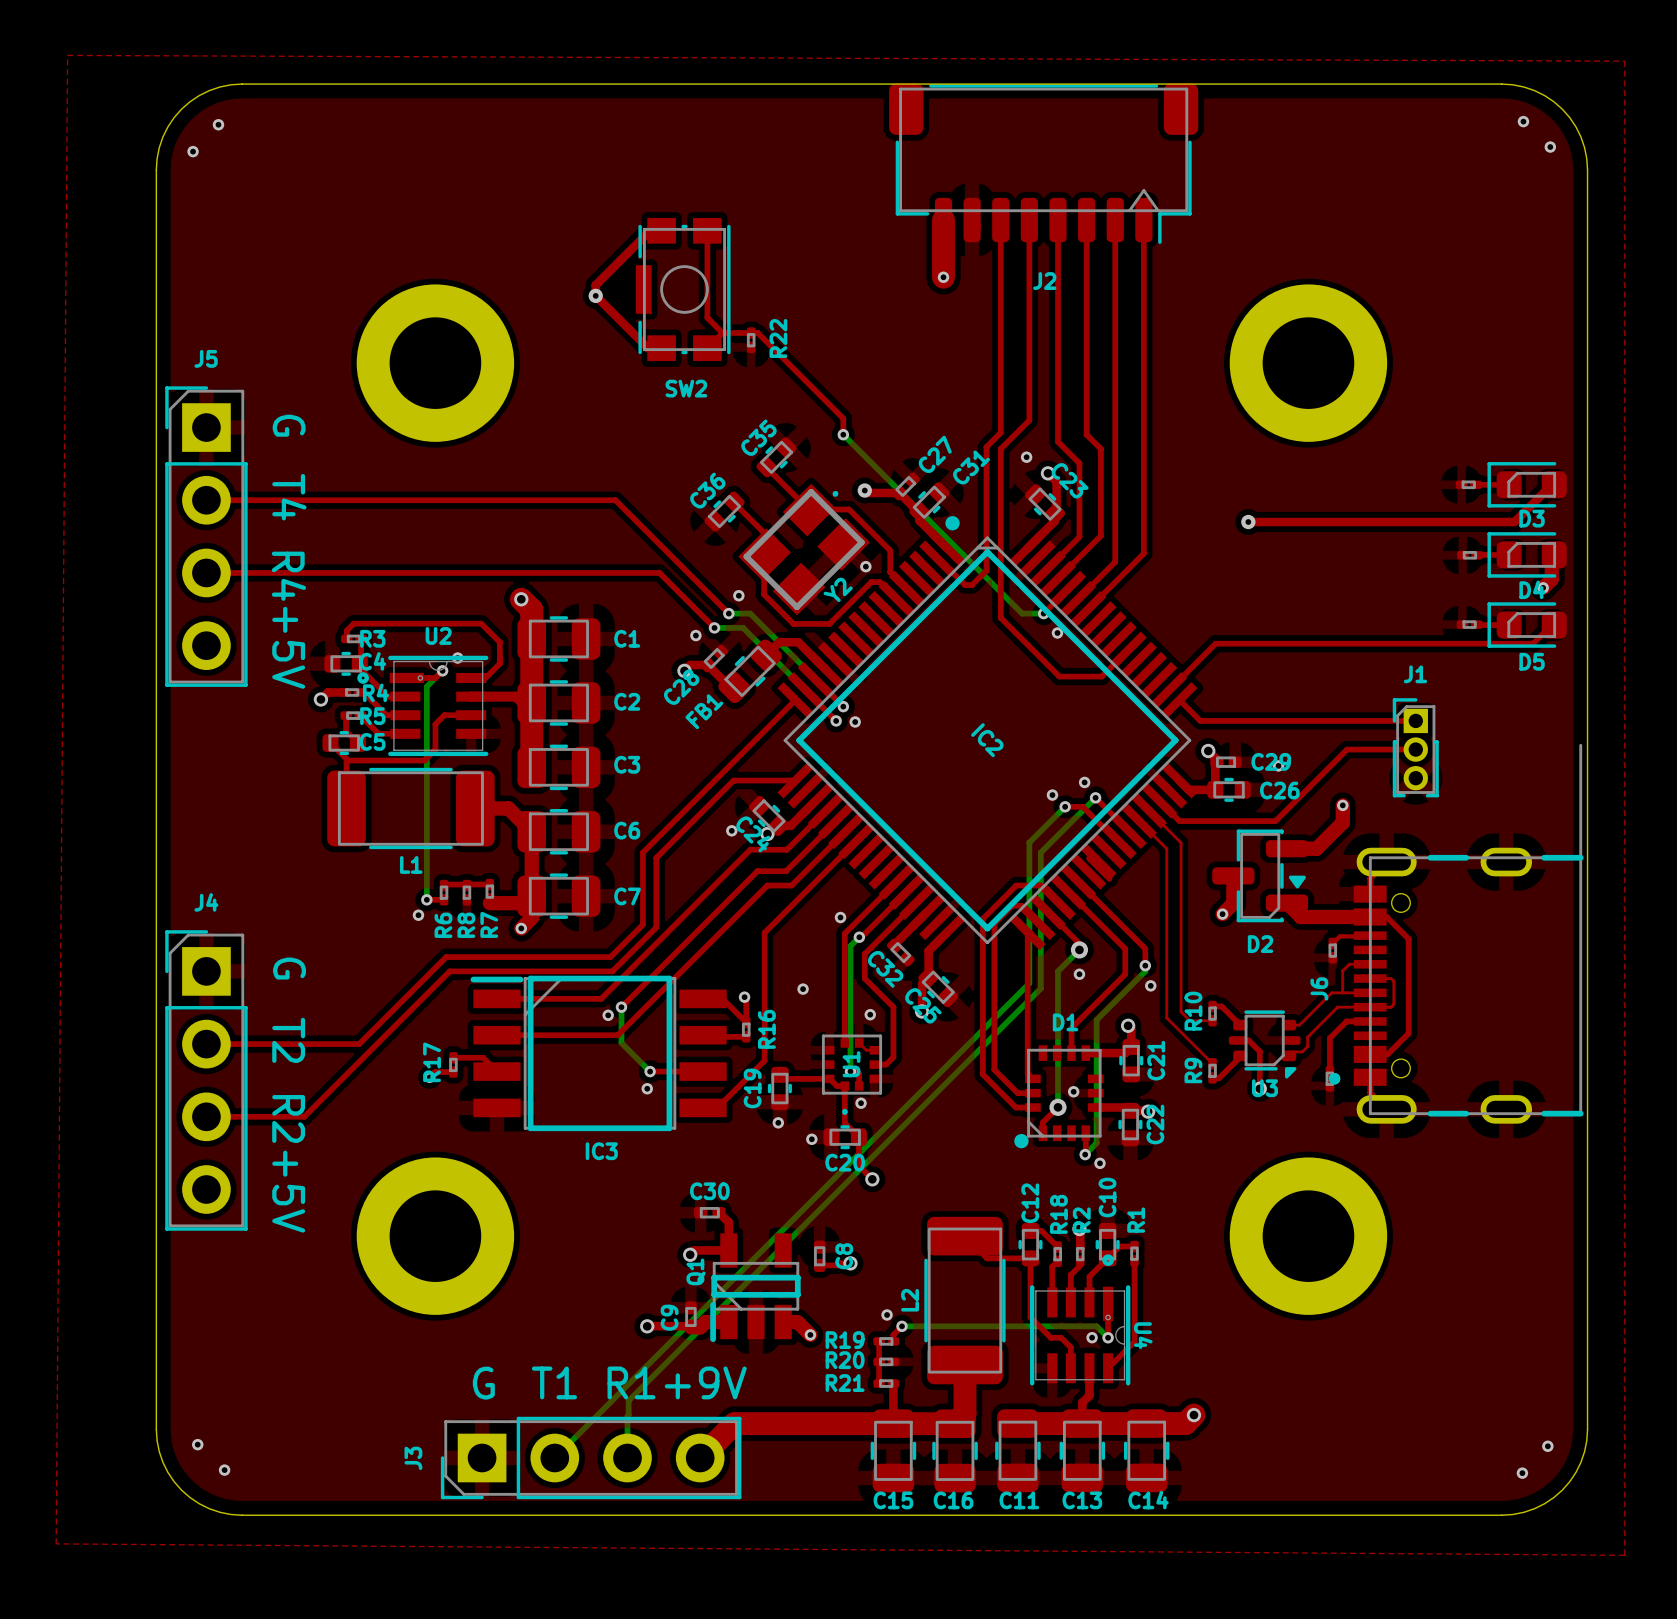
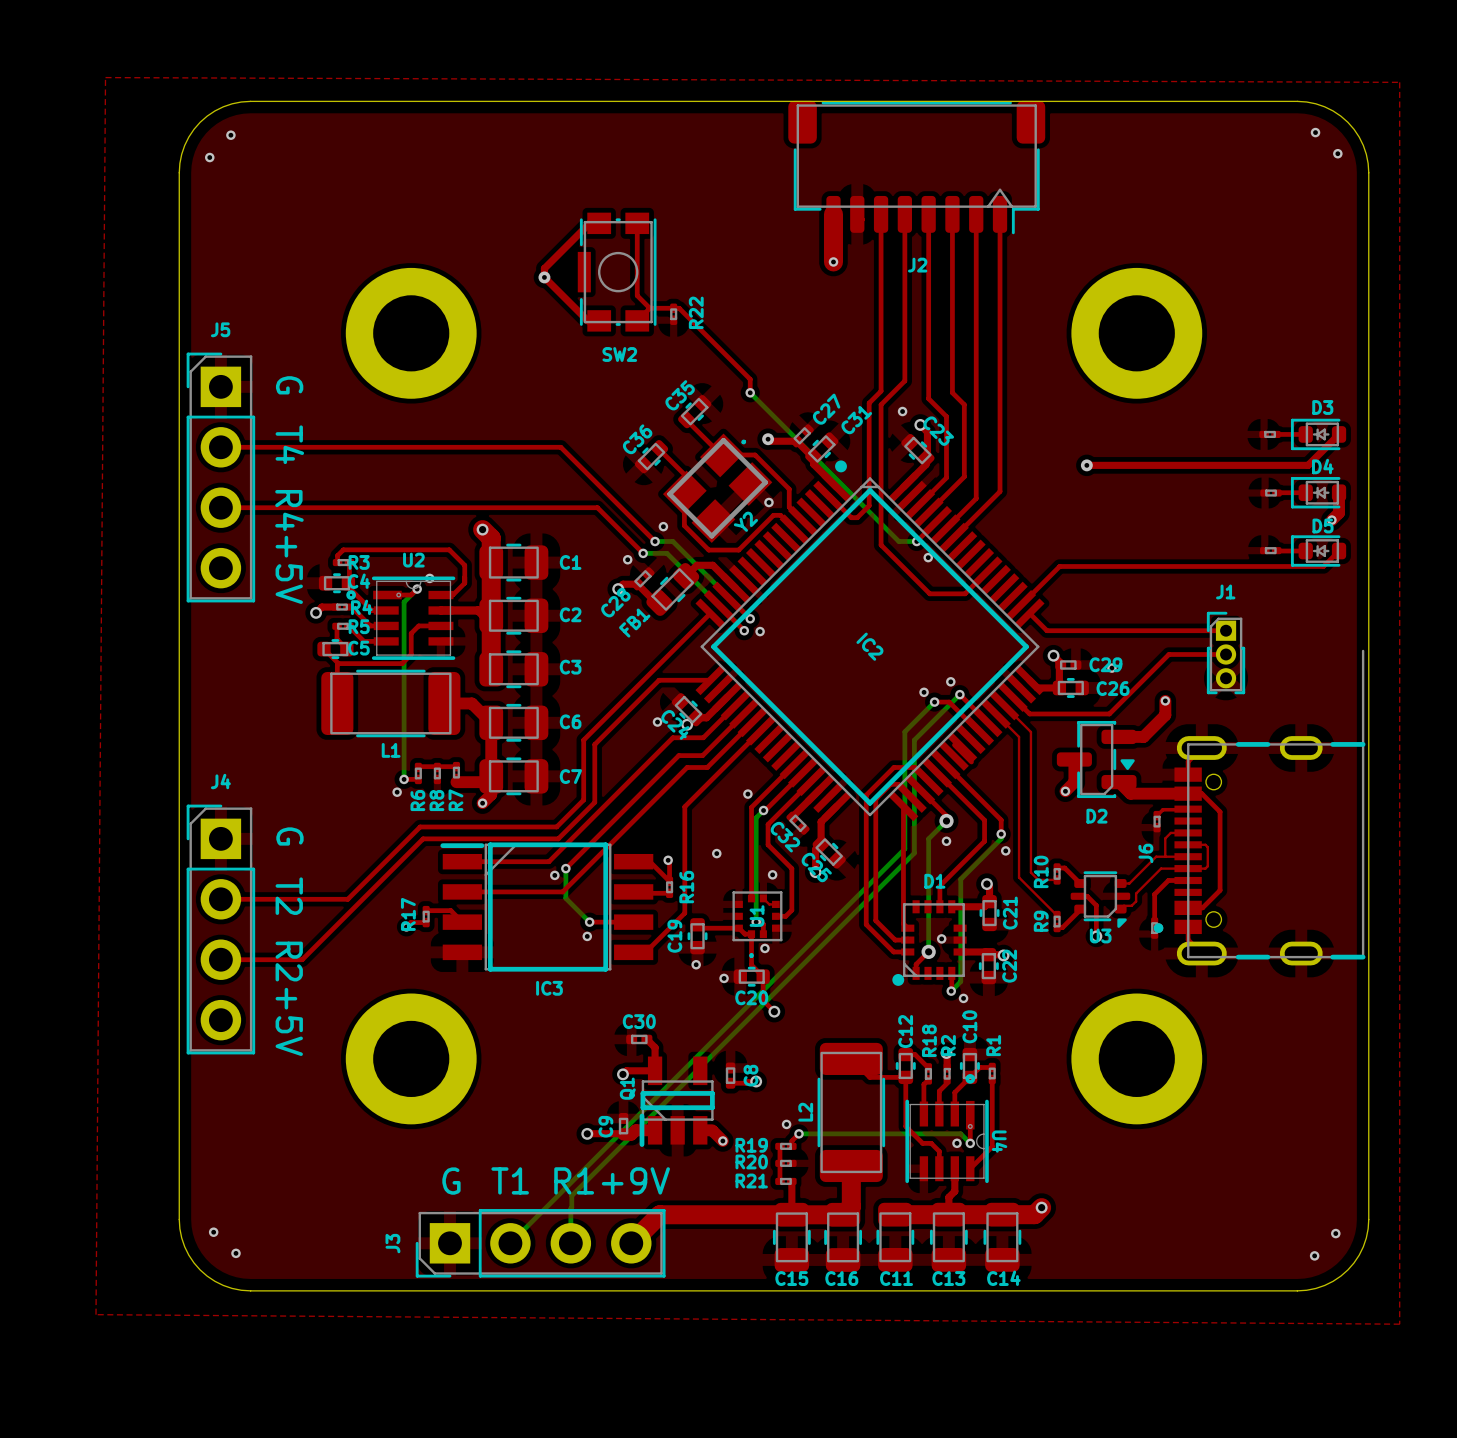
D3 footprint: [1487, 462, 1567, 508] -> [1290, 418, 1347, 451]
D3 name position: D3 (1532, 518) -> D3 (1322, 407)
D4 footprint: [1487, 532, 1567, 578] -> [1290, 477, 1347, 509]
D4 name position: D4 (1532, 589) -> D4 (1322, 466)
D5 footprint: [1487, 602, 1567, 648] -> [1290, 535, 1347, 567]
D5 name position: D5 (1532, 661) -> D5 (1323, 525)

